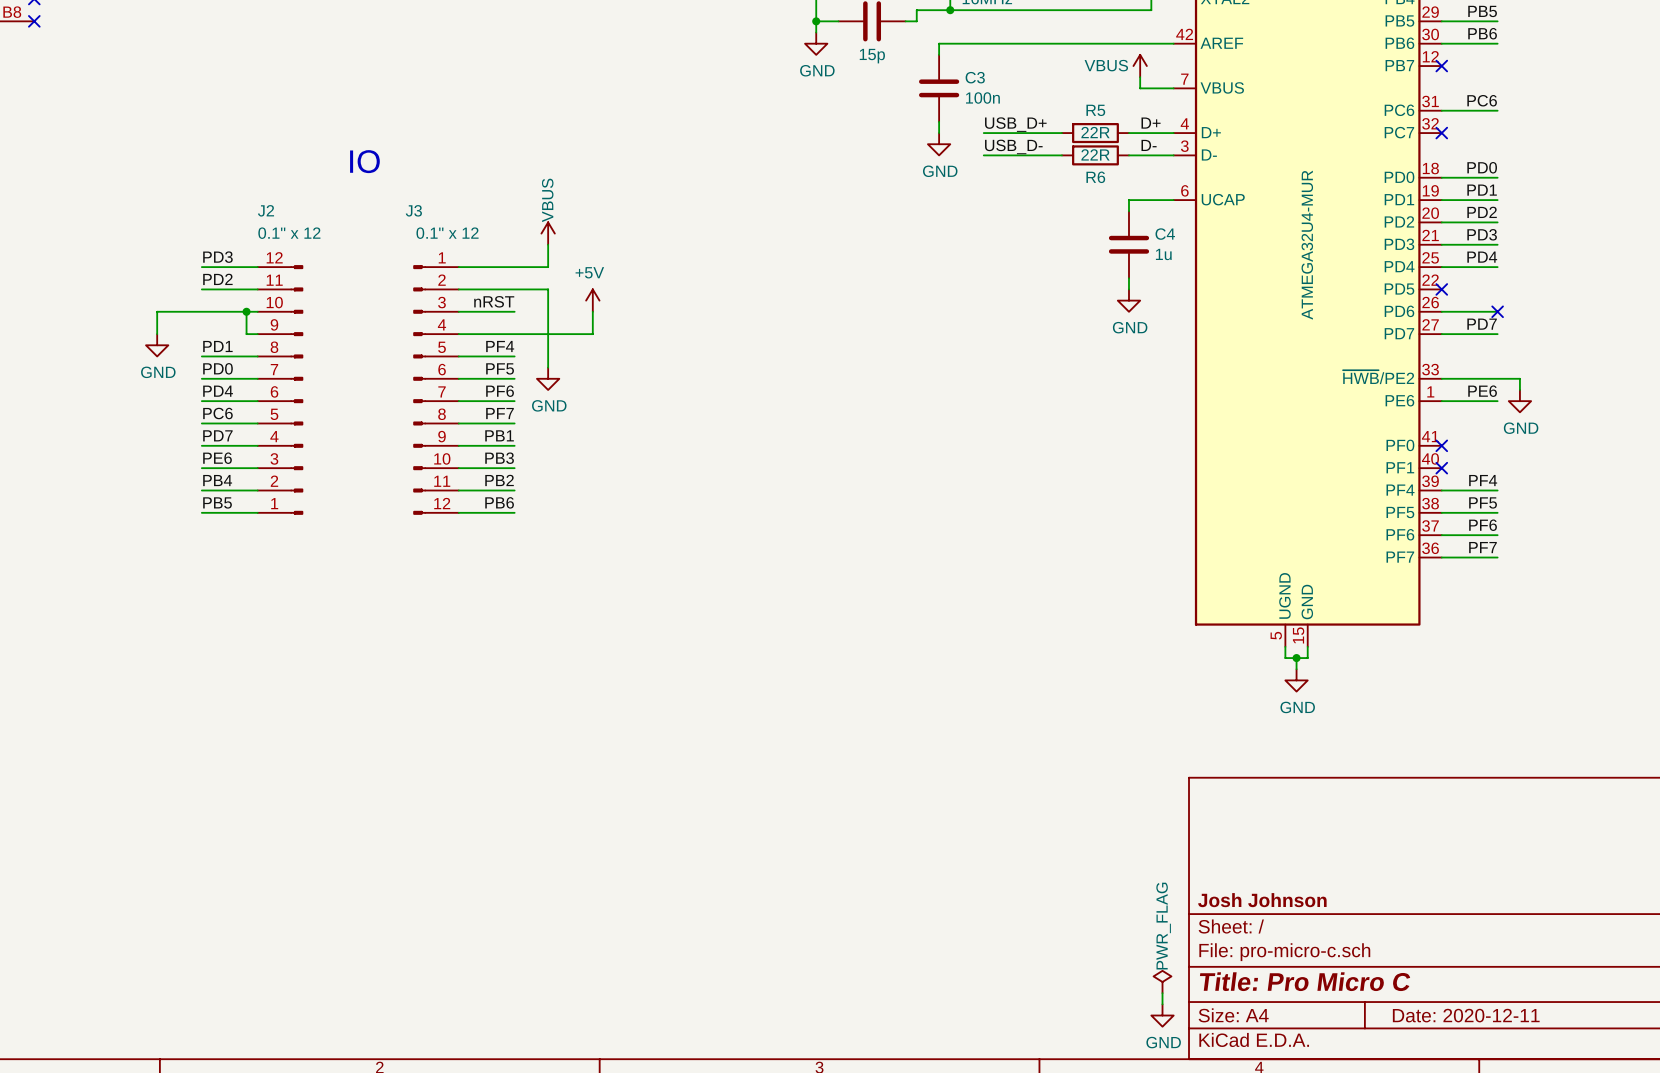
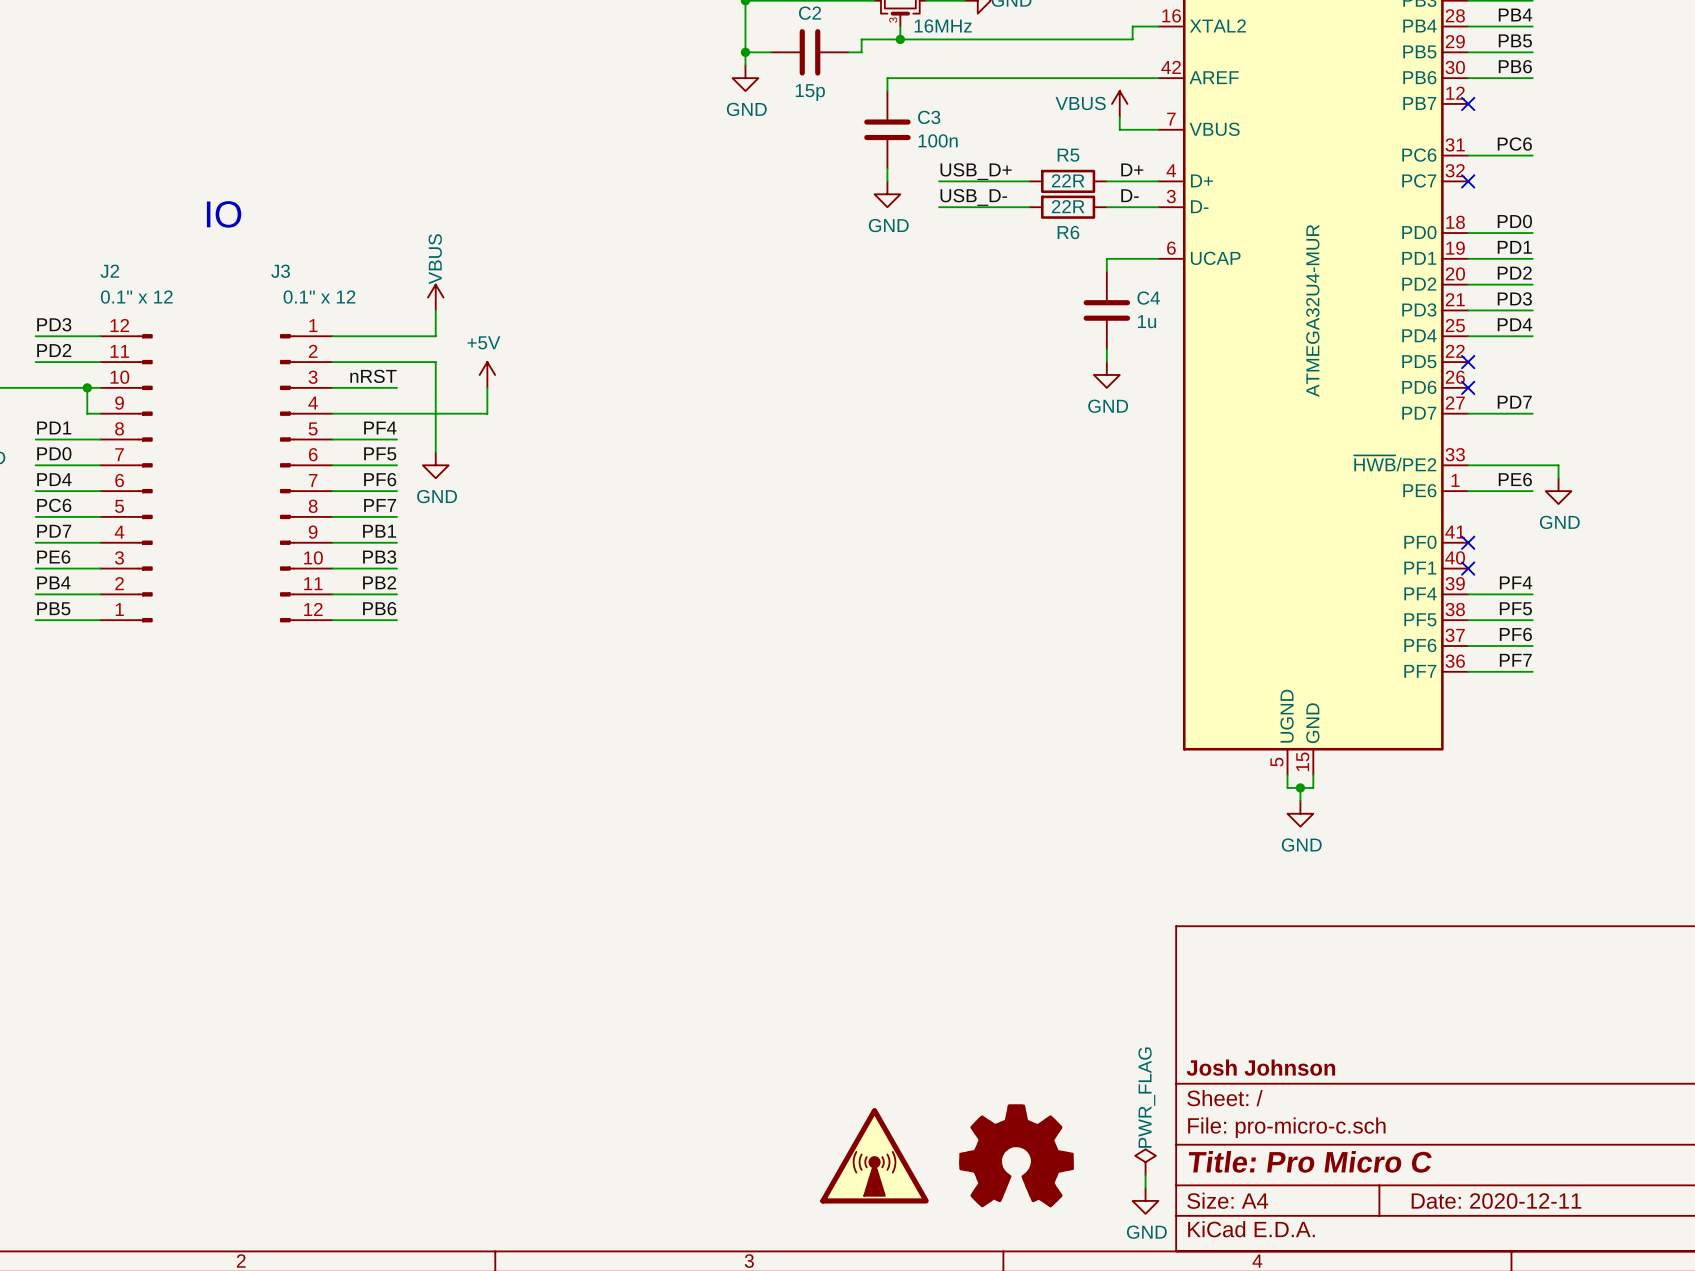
wire: (1441, 311) (1497, 311) -> none
no-connect mark: none -> (1468, 387)
no-connect mark: (1497, 311) -> none
part: none -> (874, 1155)
part: none -> (1016, 1155)

